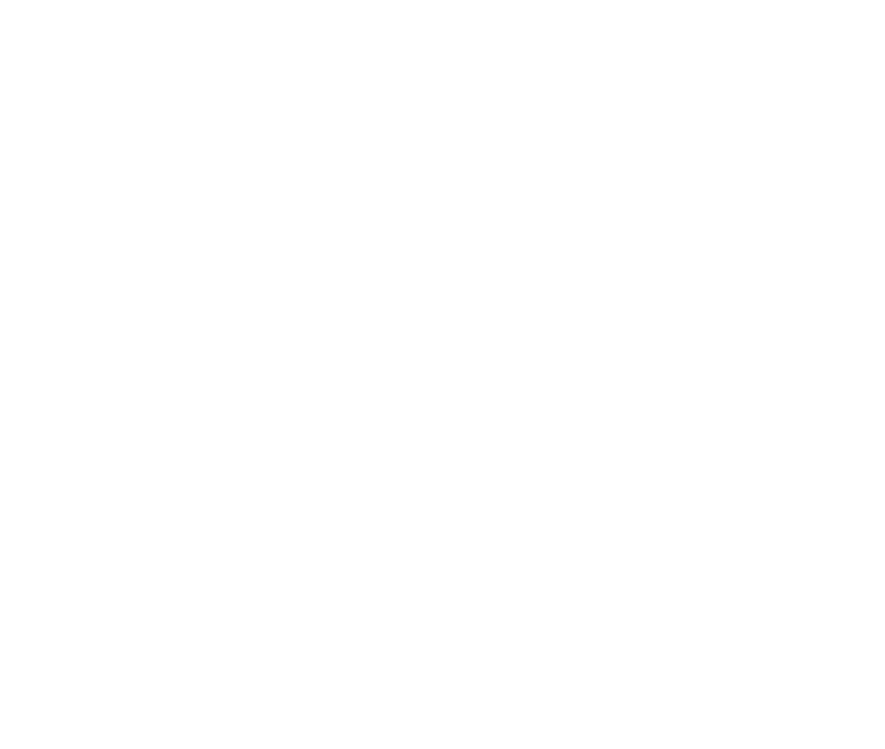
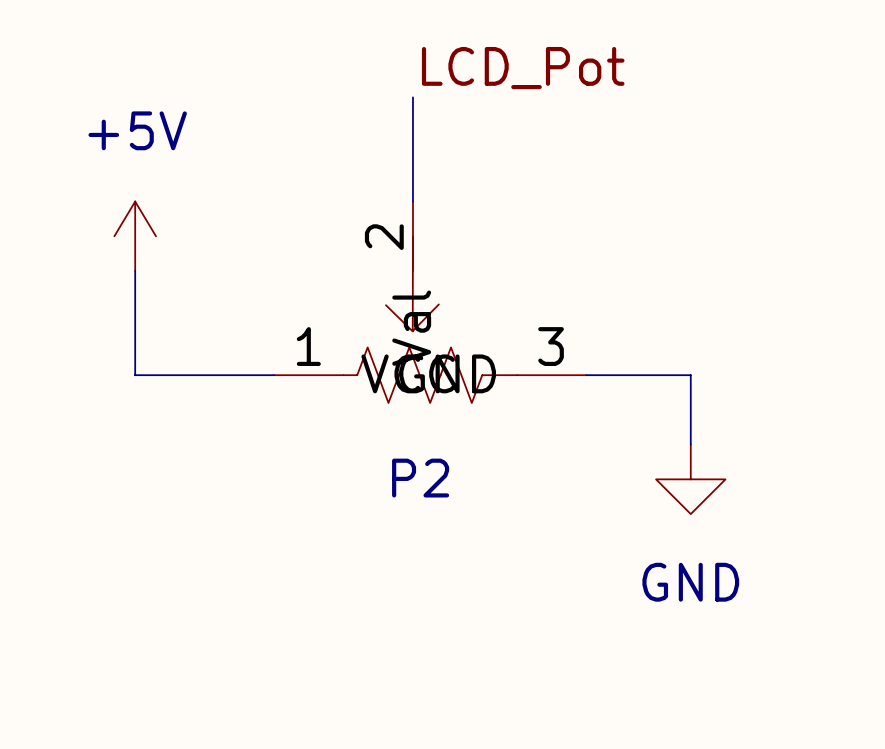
label: none -> LCD_Pot (523, 68)
wire: none -> (412, 97) (412, 201)
power symbol: none -> +5V (135, 236)
wire: none -> (135, 271) (135, 375) (274, 375)
P2: none -> (430, 302)
wire: none -> (586, 375) (690, 375) (690, 444)
power symbol: none -> GND (690, 479)

